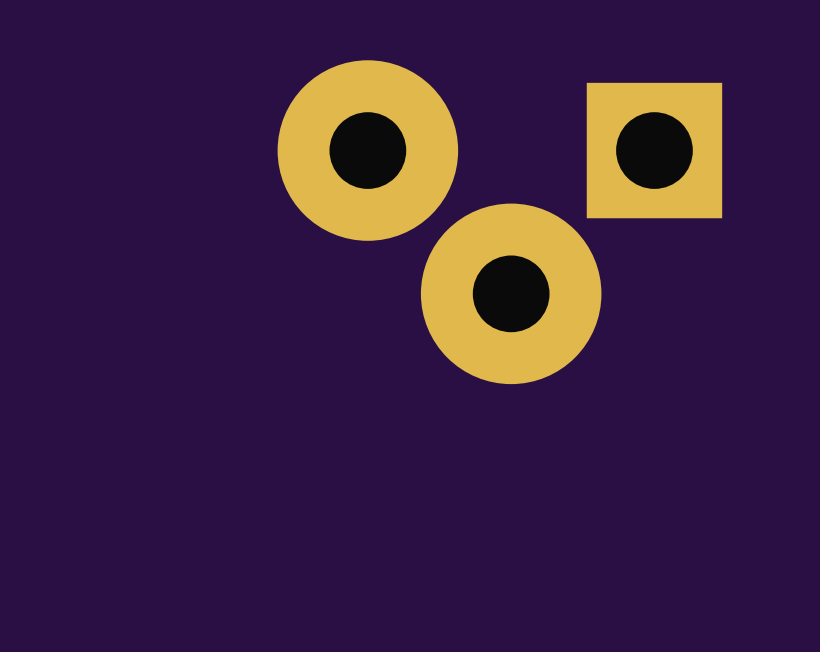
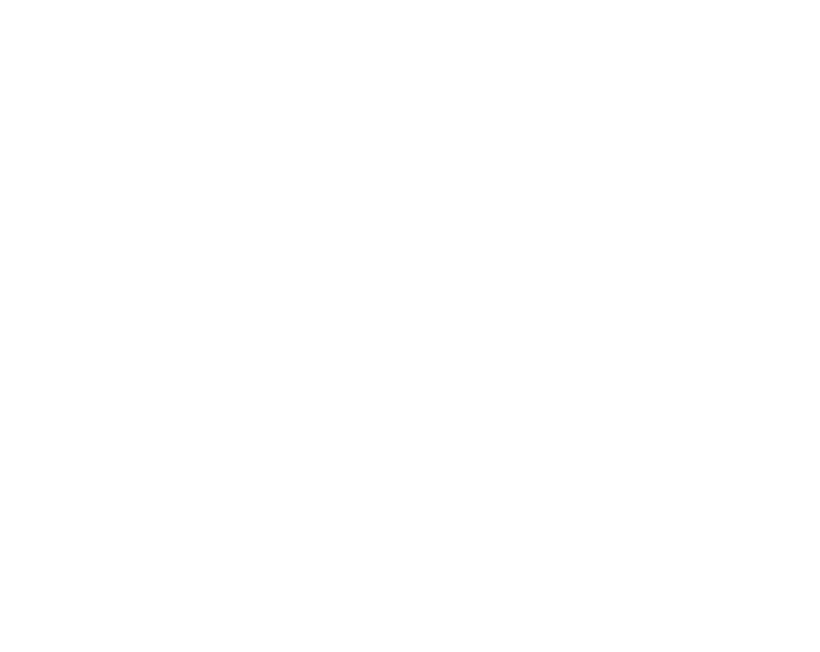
part: (499, 222) -> none

